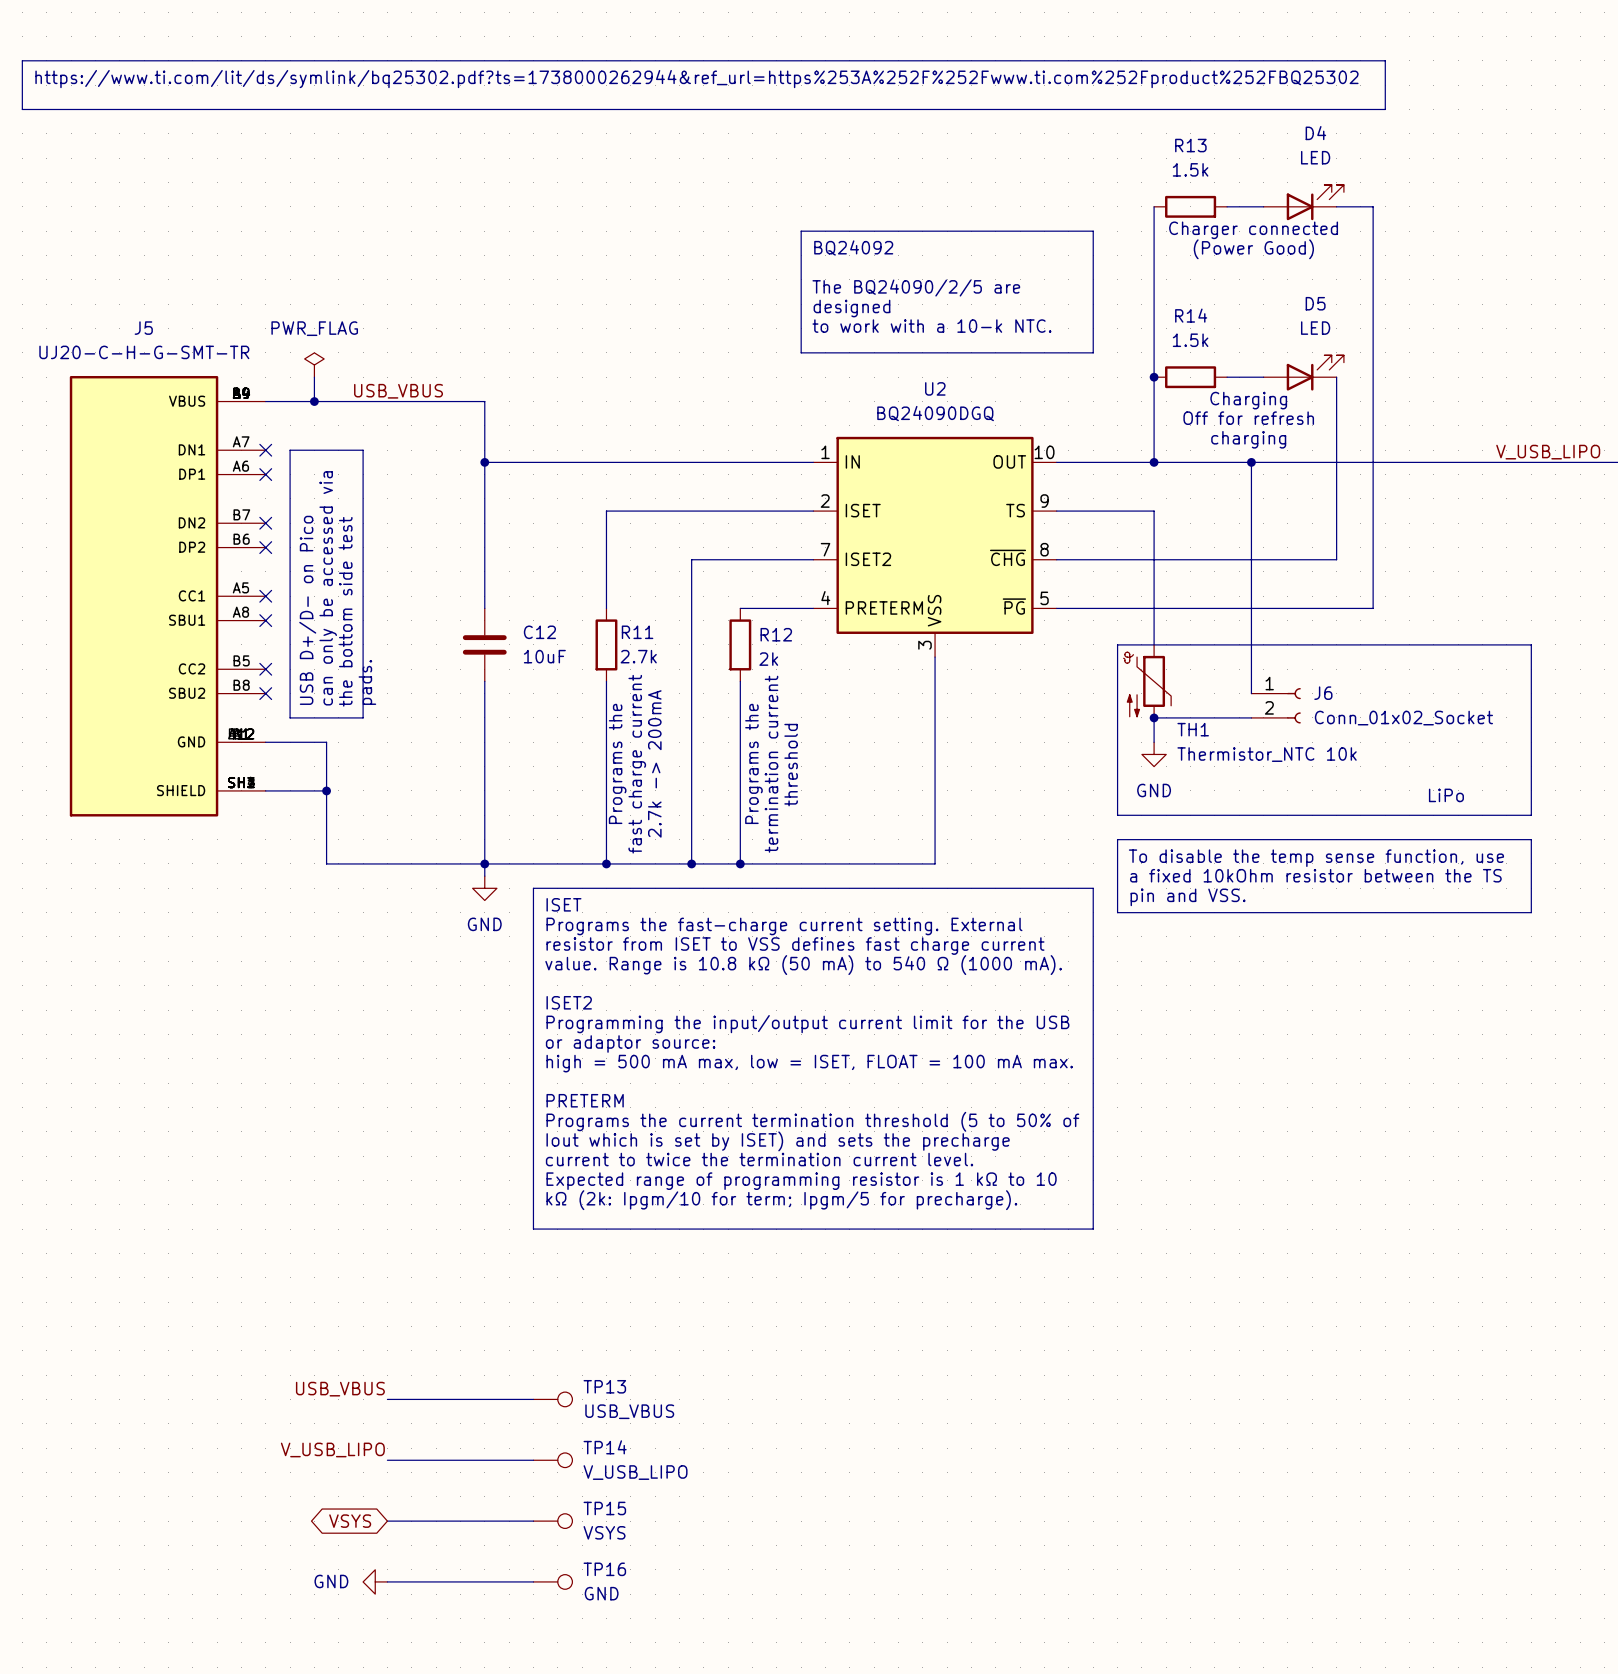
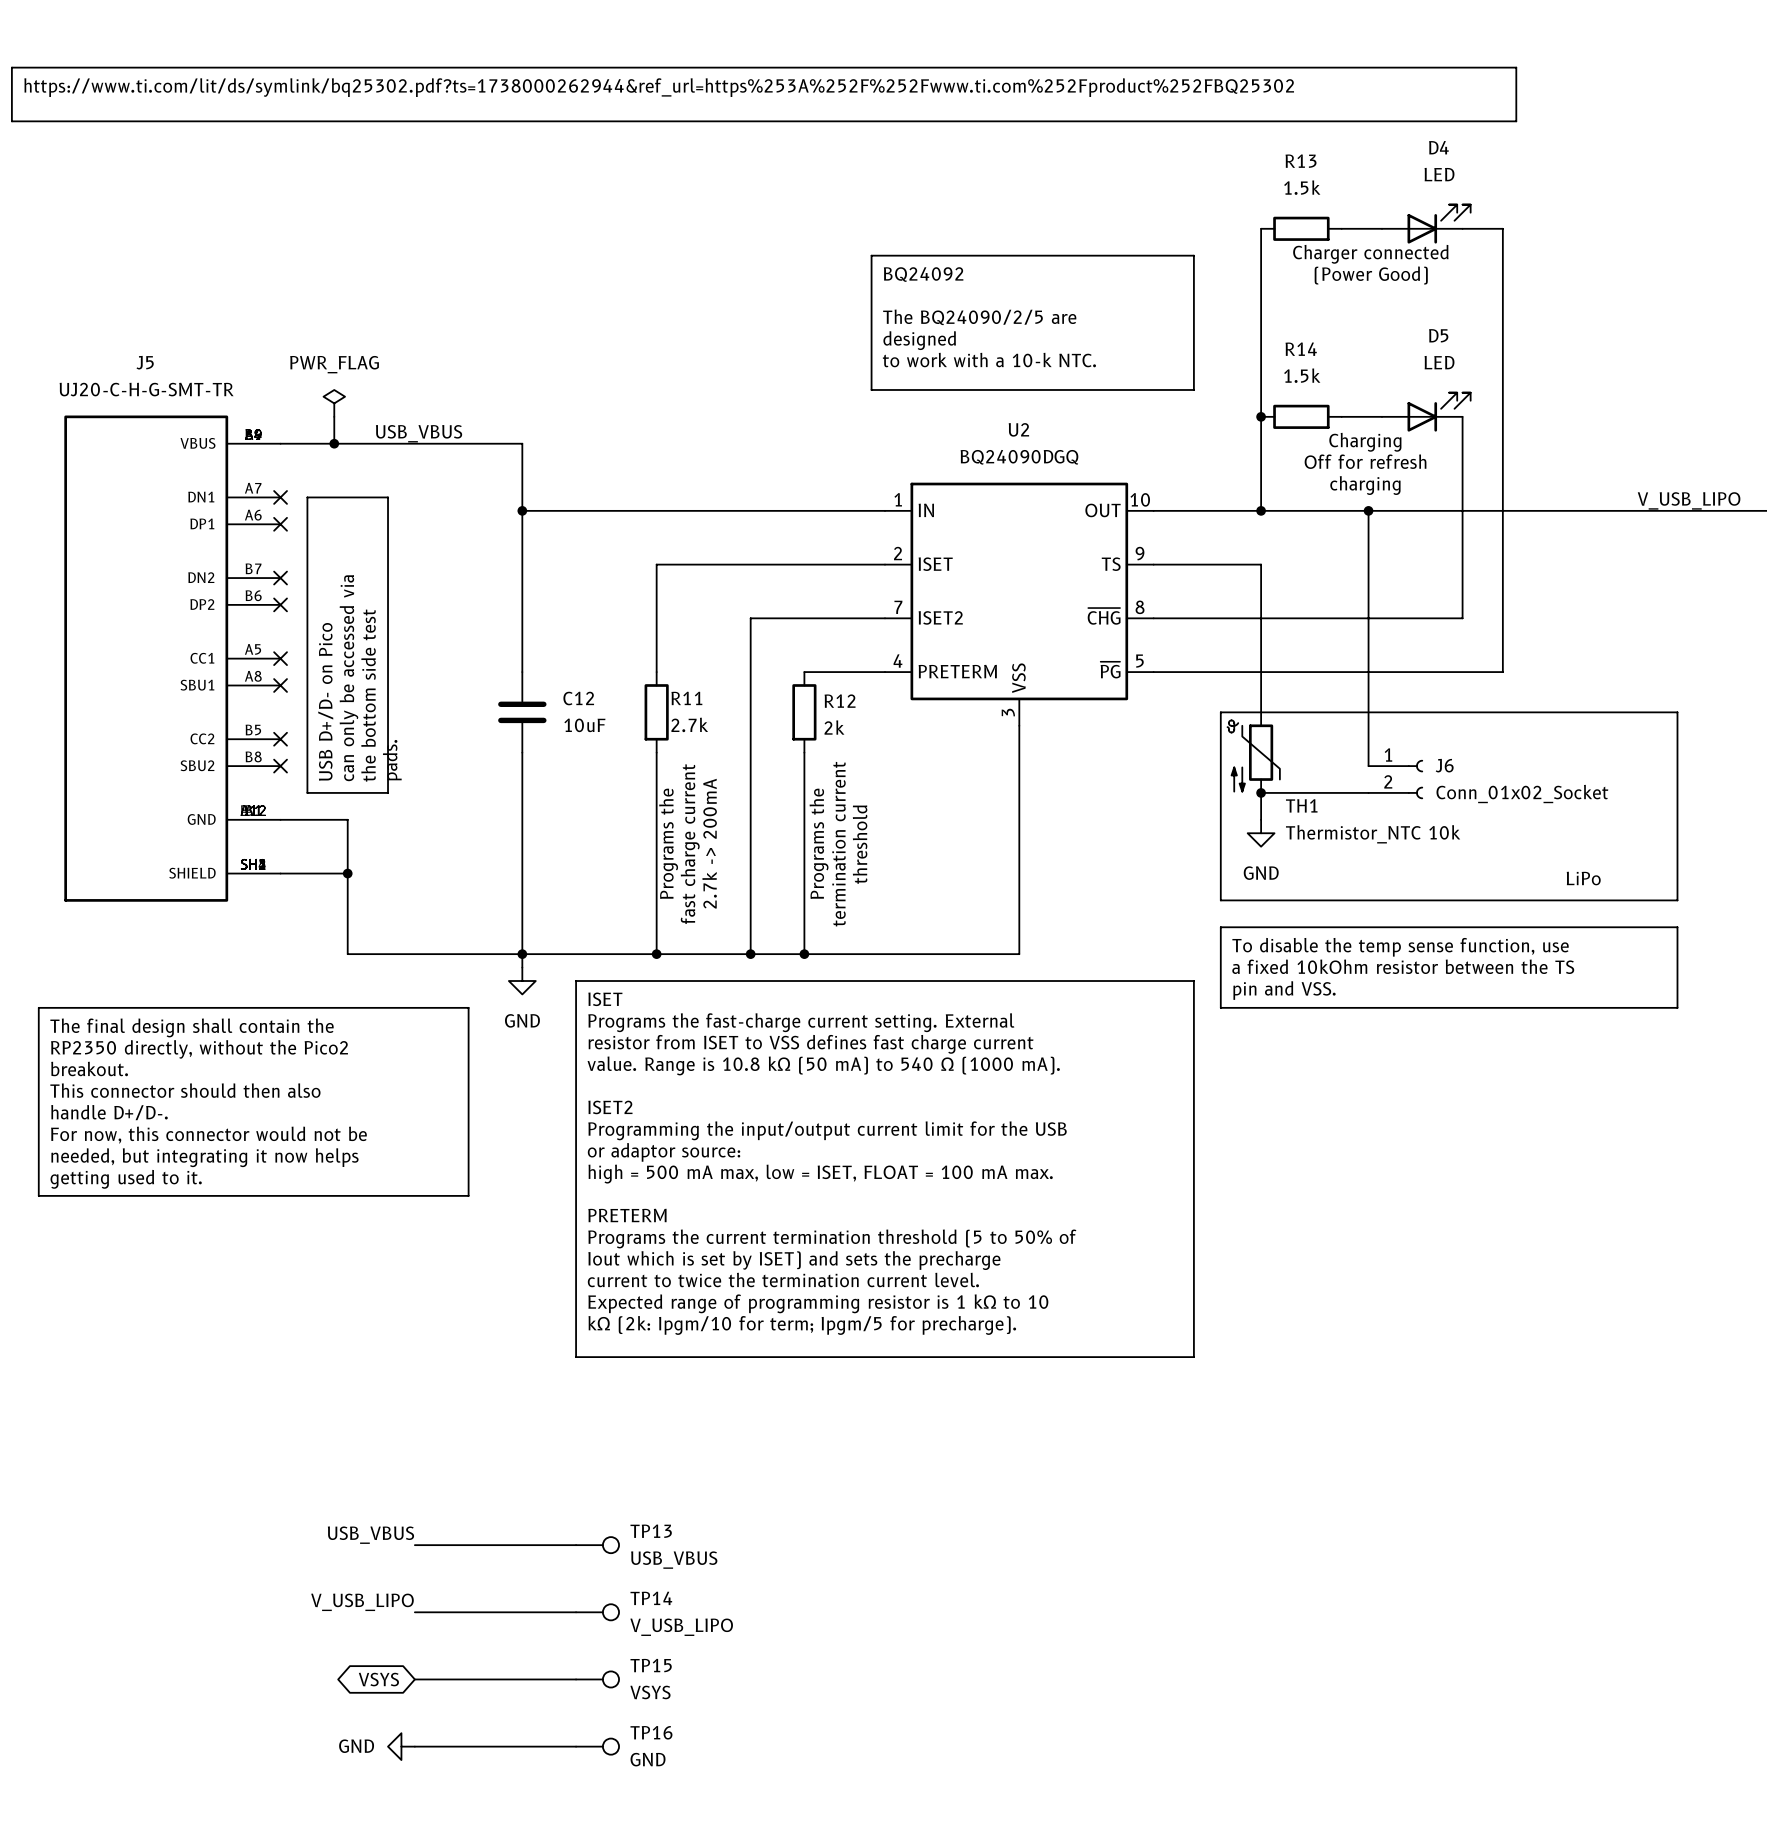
line: none -> (38, 1007) (468, 1007) (468, 1195) (38, 1195) (38, 1007)
text: none -> The final design shall contain the (192, 1027)
text: none -> RP2350 directly, without the Pico2 (199, 1049)
text: none -> breakout. (89, 1068)
text: none -> This connector should then also (185, 1090)
text: none -> handle D+/D-. (109, 1112)
text: none -> For now, this connector would not be (208, 1135)
text: none -> needed, but integrating it now helps (204, 1157)
text: none -> getting used to it. (126, 1179)

